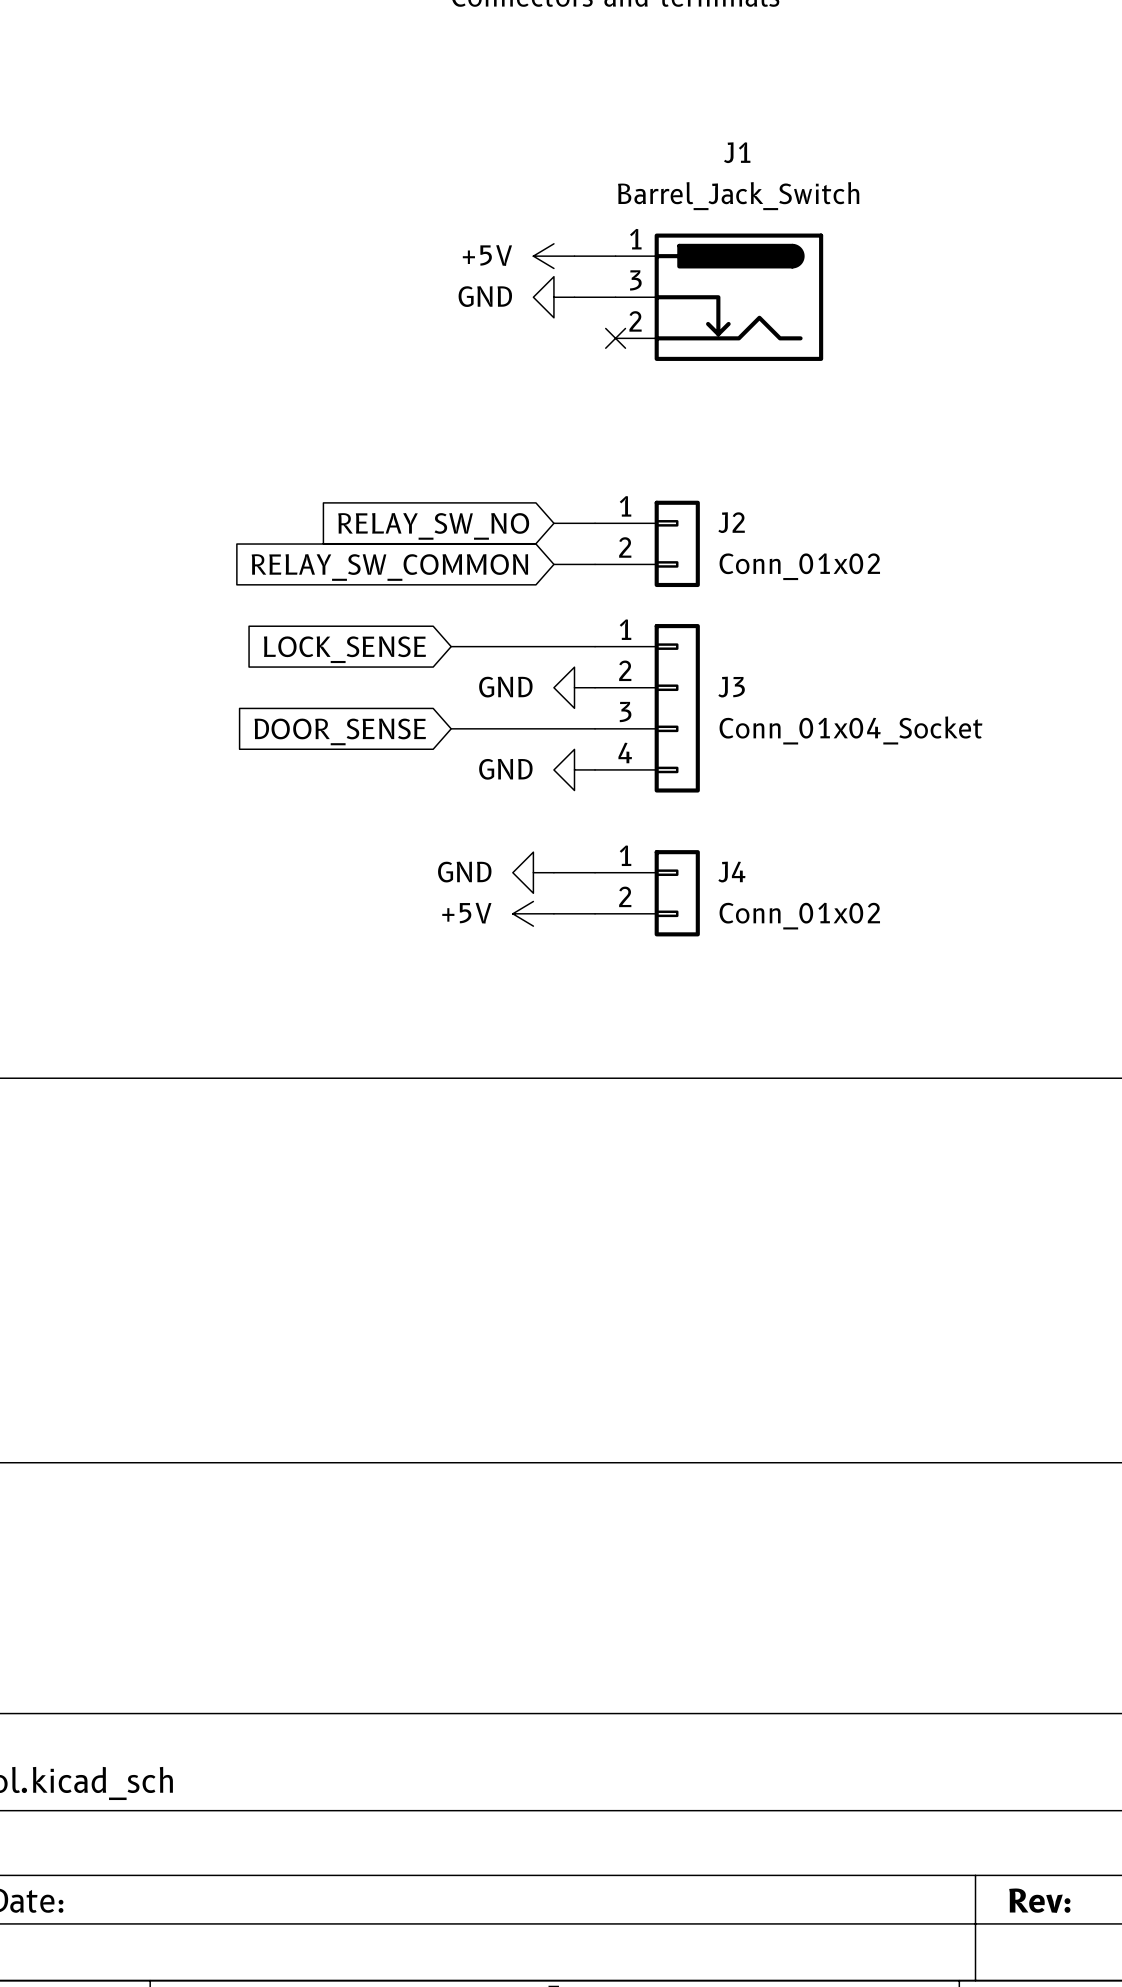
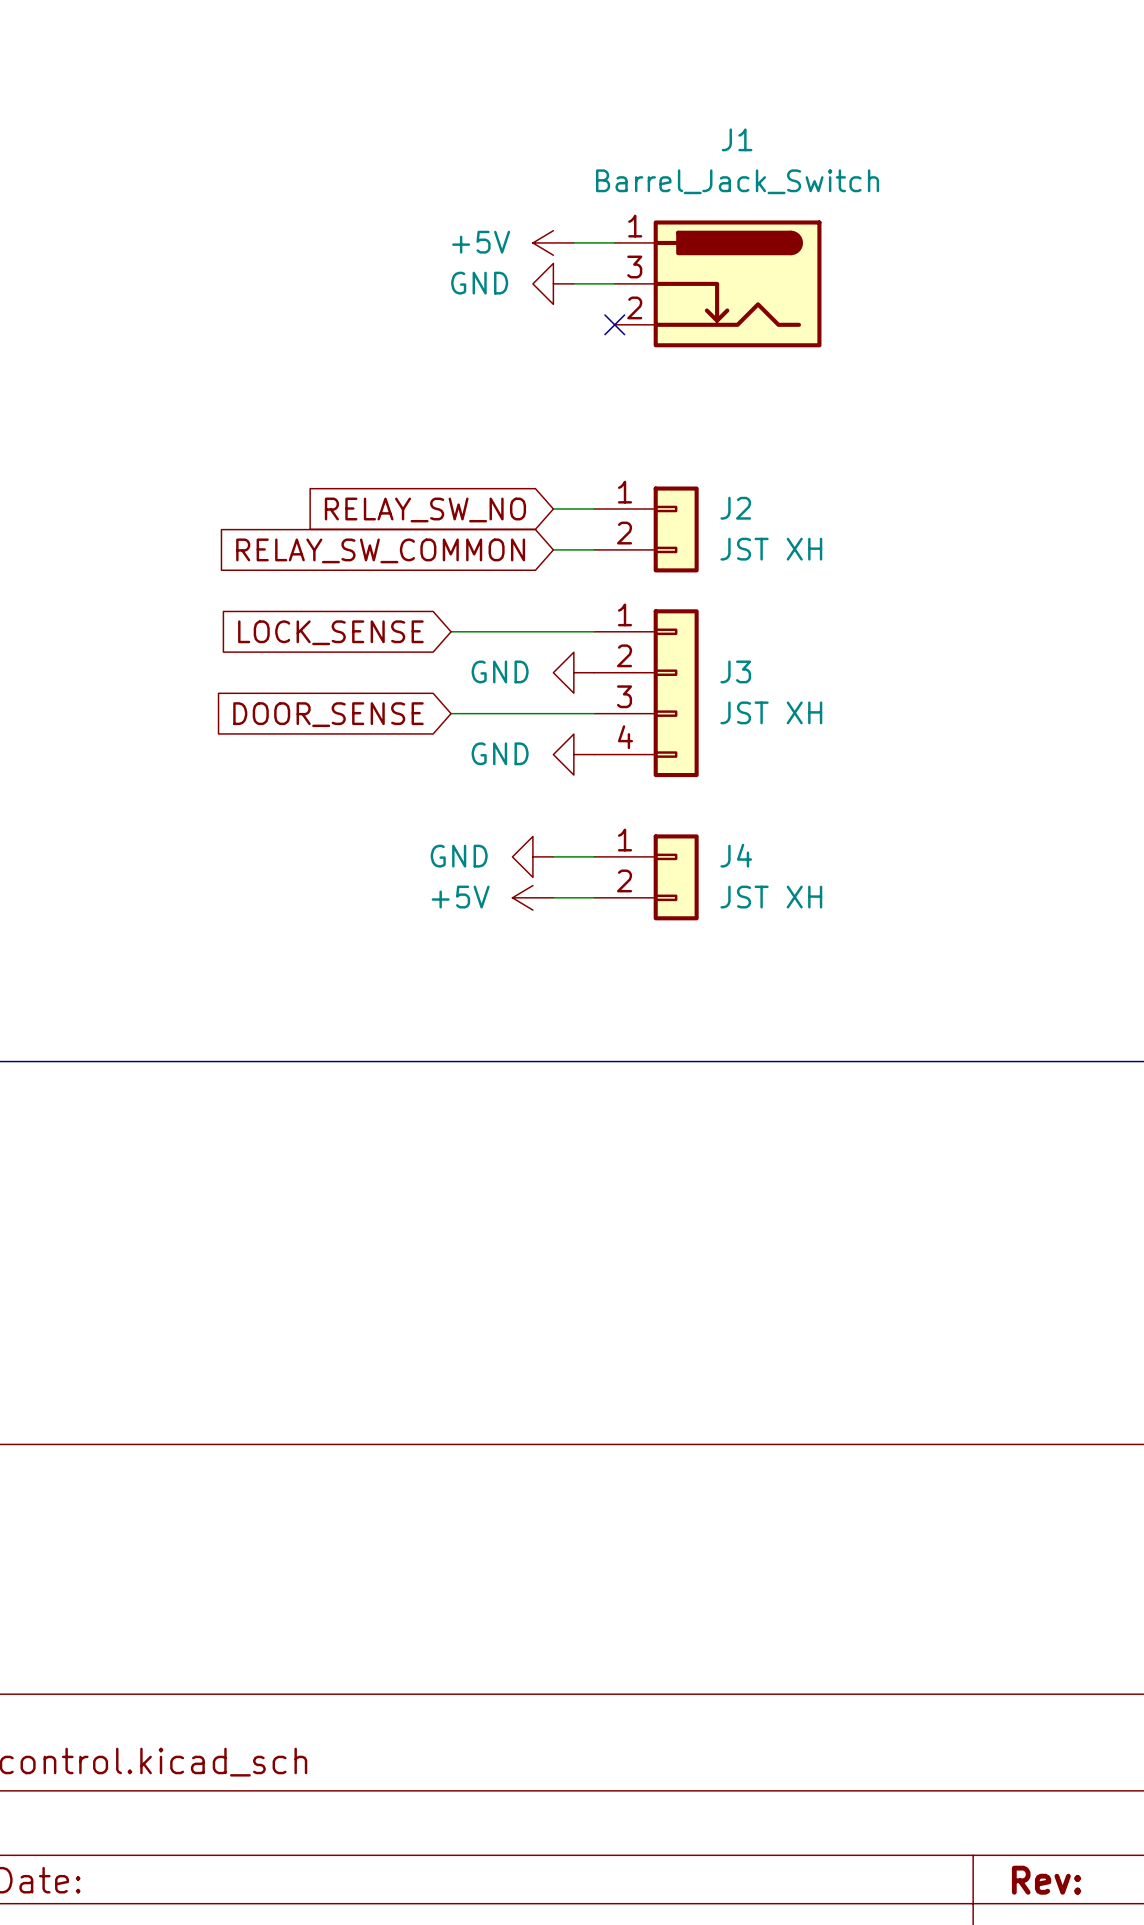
J2 value: Conn_01x02 (799, 566) -> JST XH (771, 549)
J3 value: Conn_01x04_Socket (850, 730) -> JST XH (771, 712)
J4 value: Conn_01x02 (799, 916) -> JST XH (771, 897)

